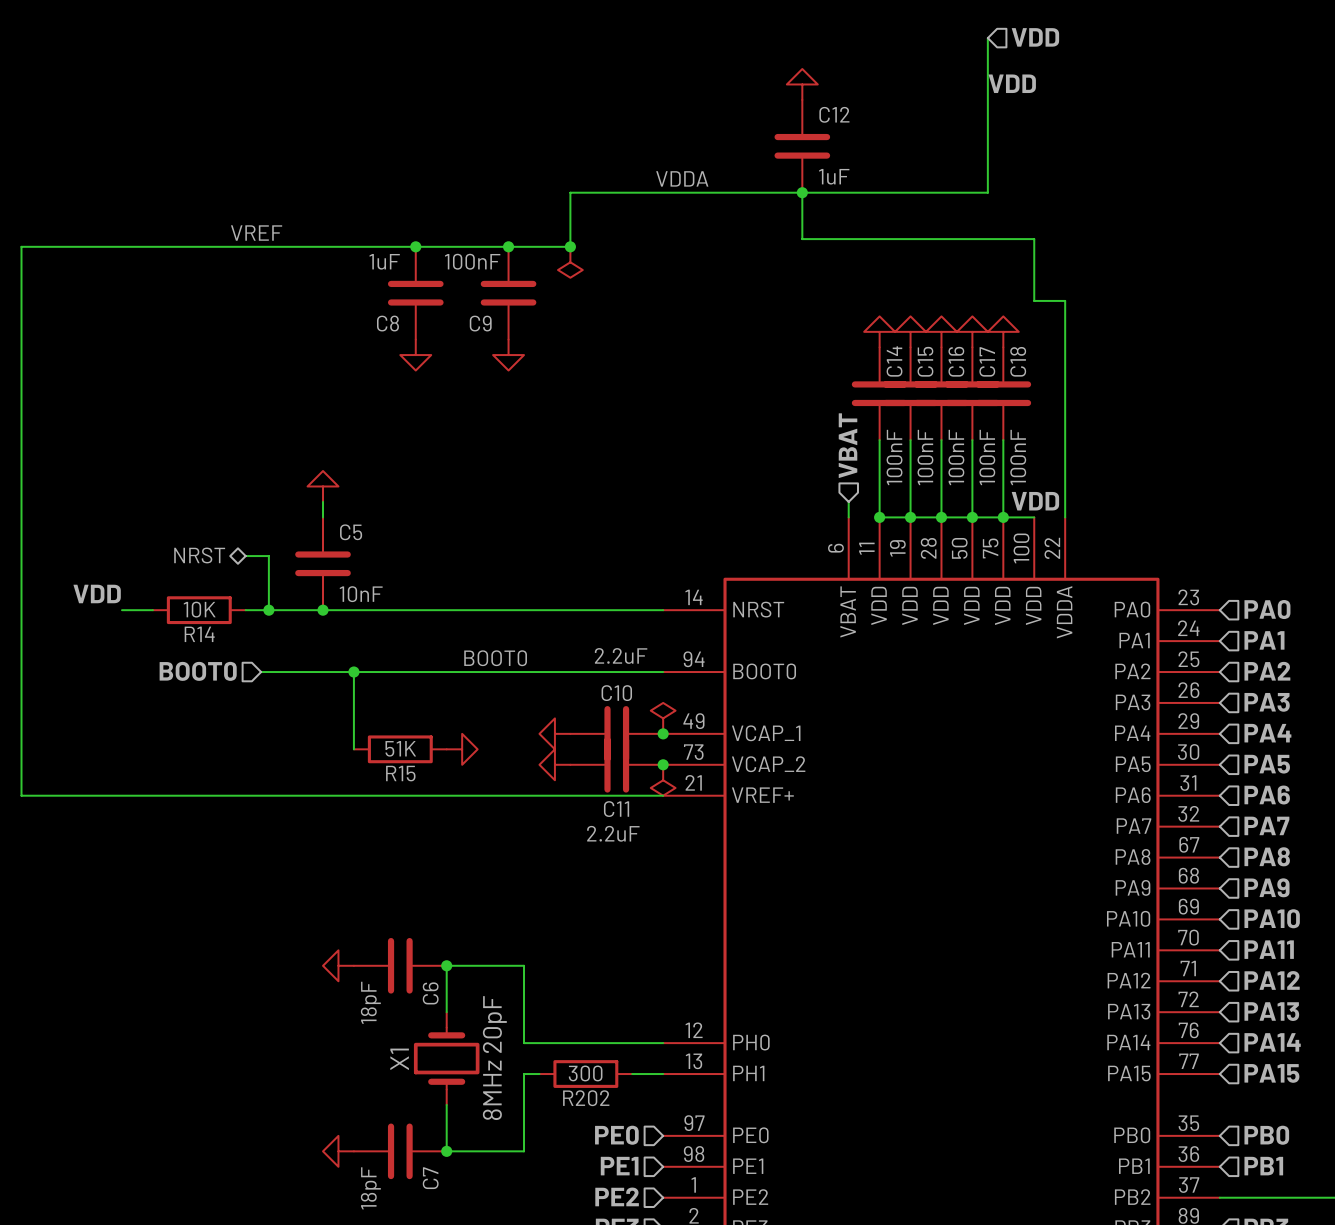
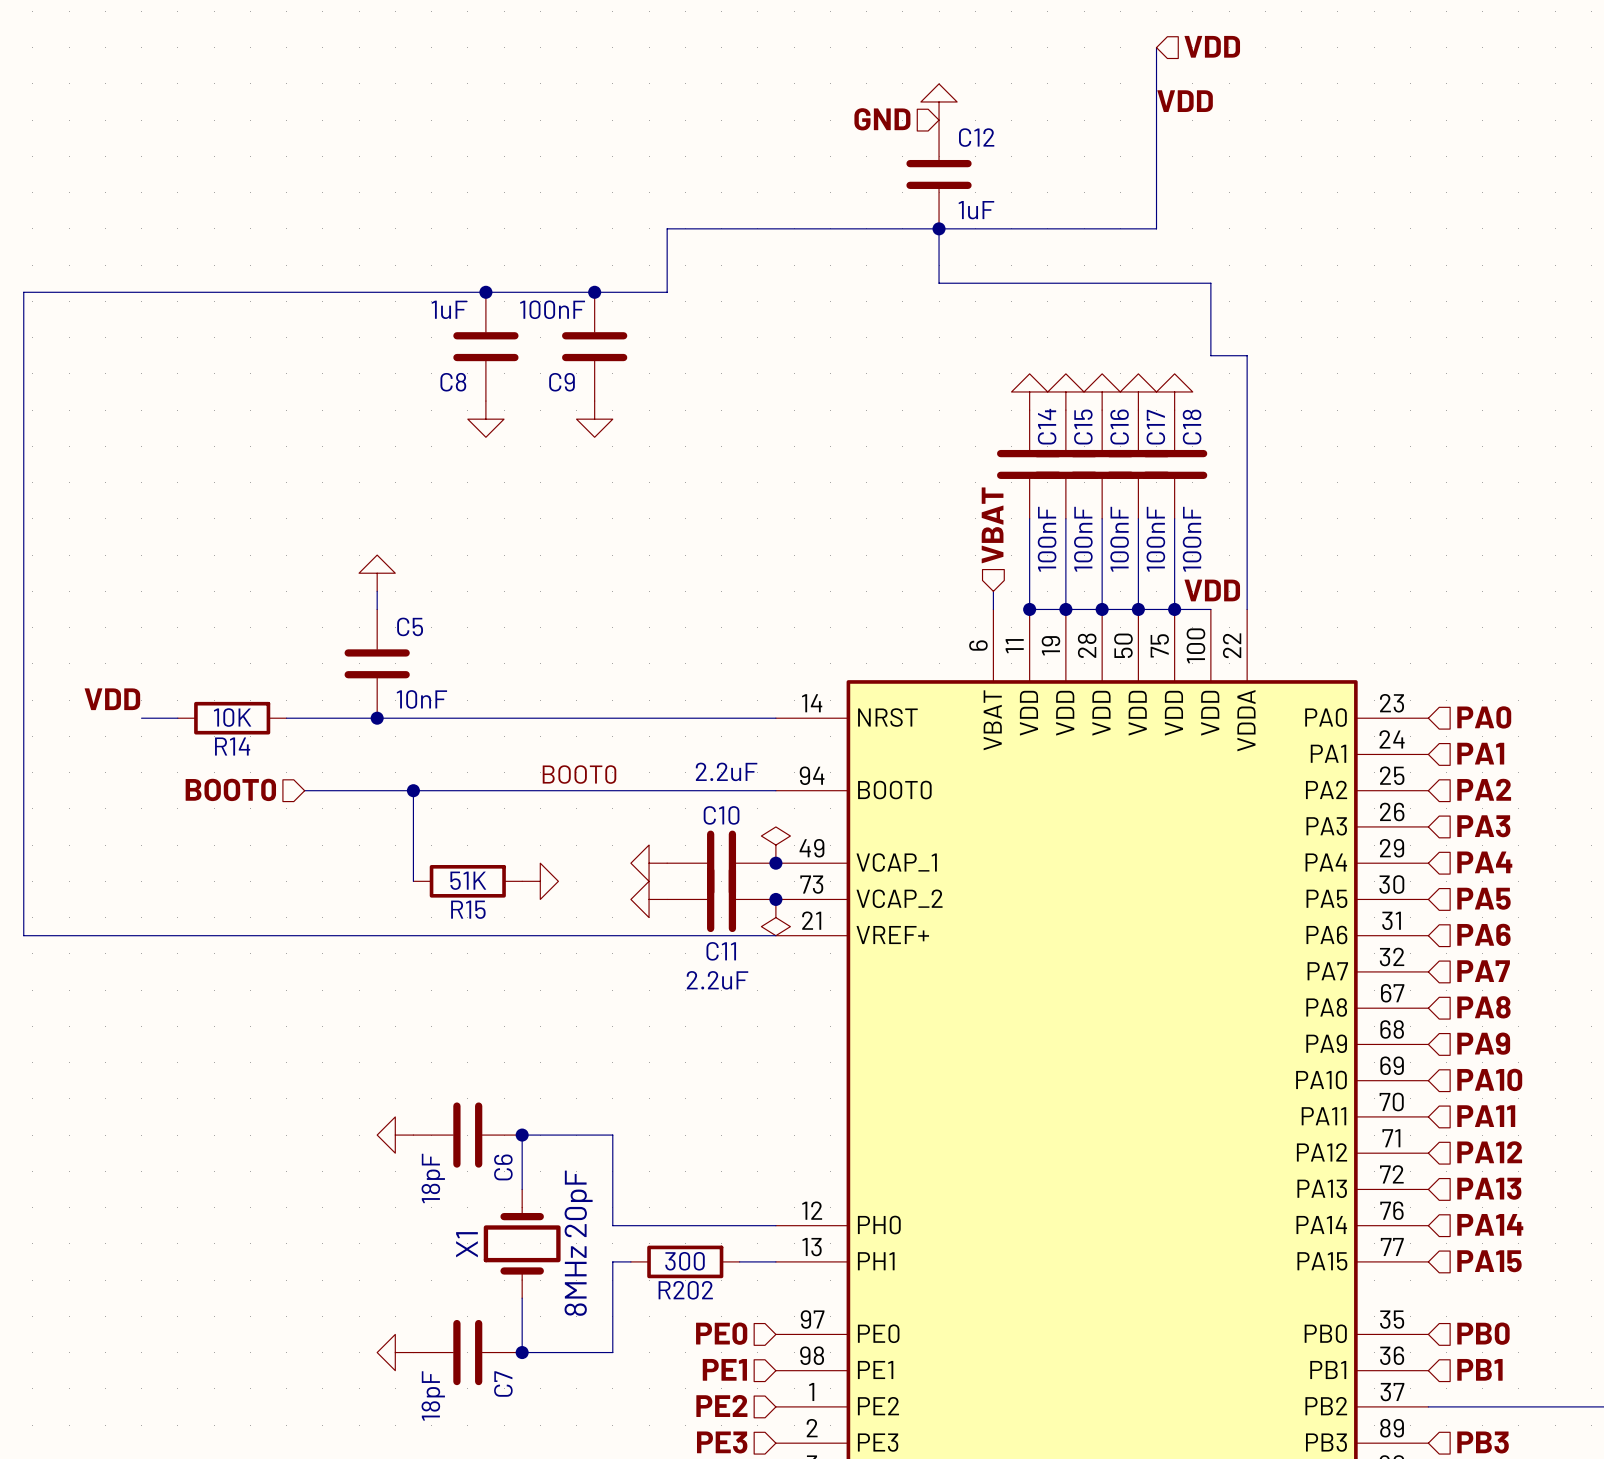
hierarchical label: none -> GND (882, 119)
label: VDDA (682, 178) -> none
label: VREF (256, 233) -> none
junction: (570, 246) -> none
power symbol: (570, 262) -> none
hierarchical label: NRST (199, 555) -> none
wire: (245, 556) (268, 556) (268, 610) -> none
junction: (268, 610) -> none

